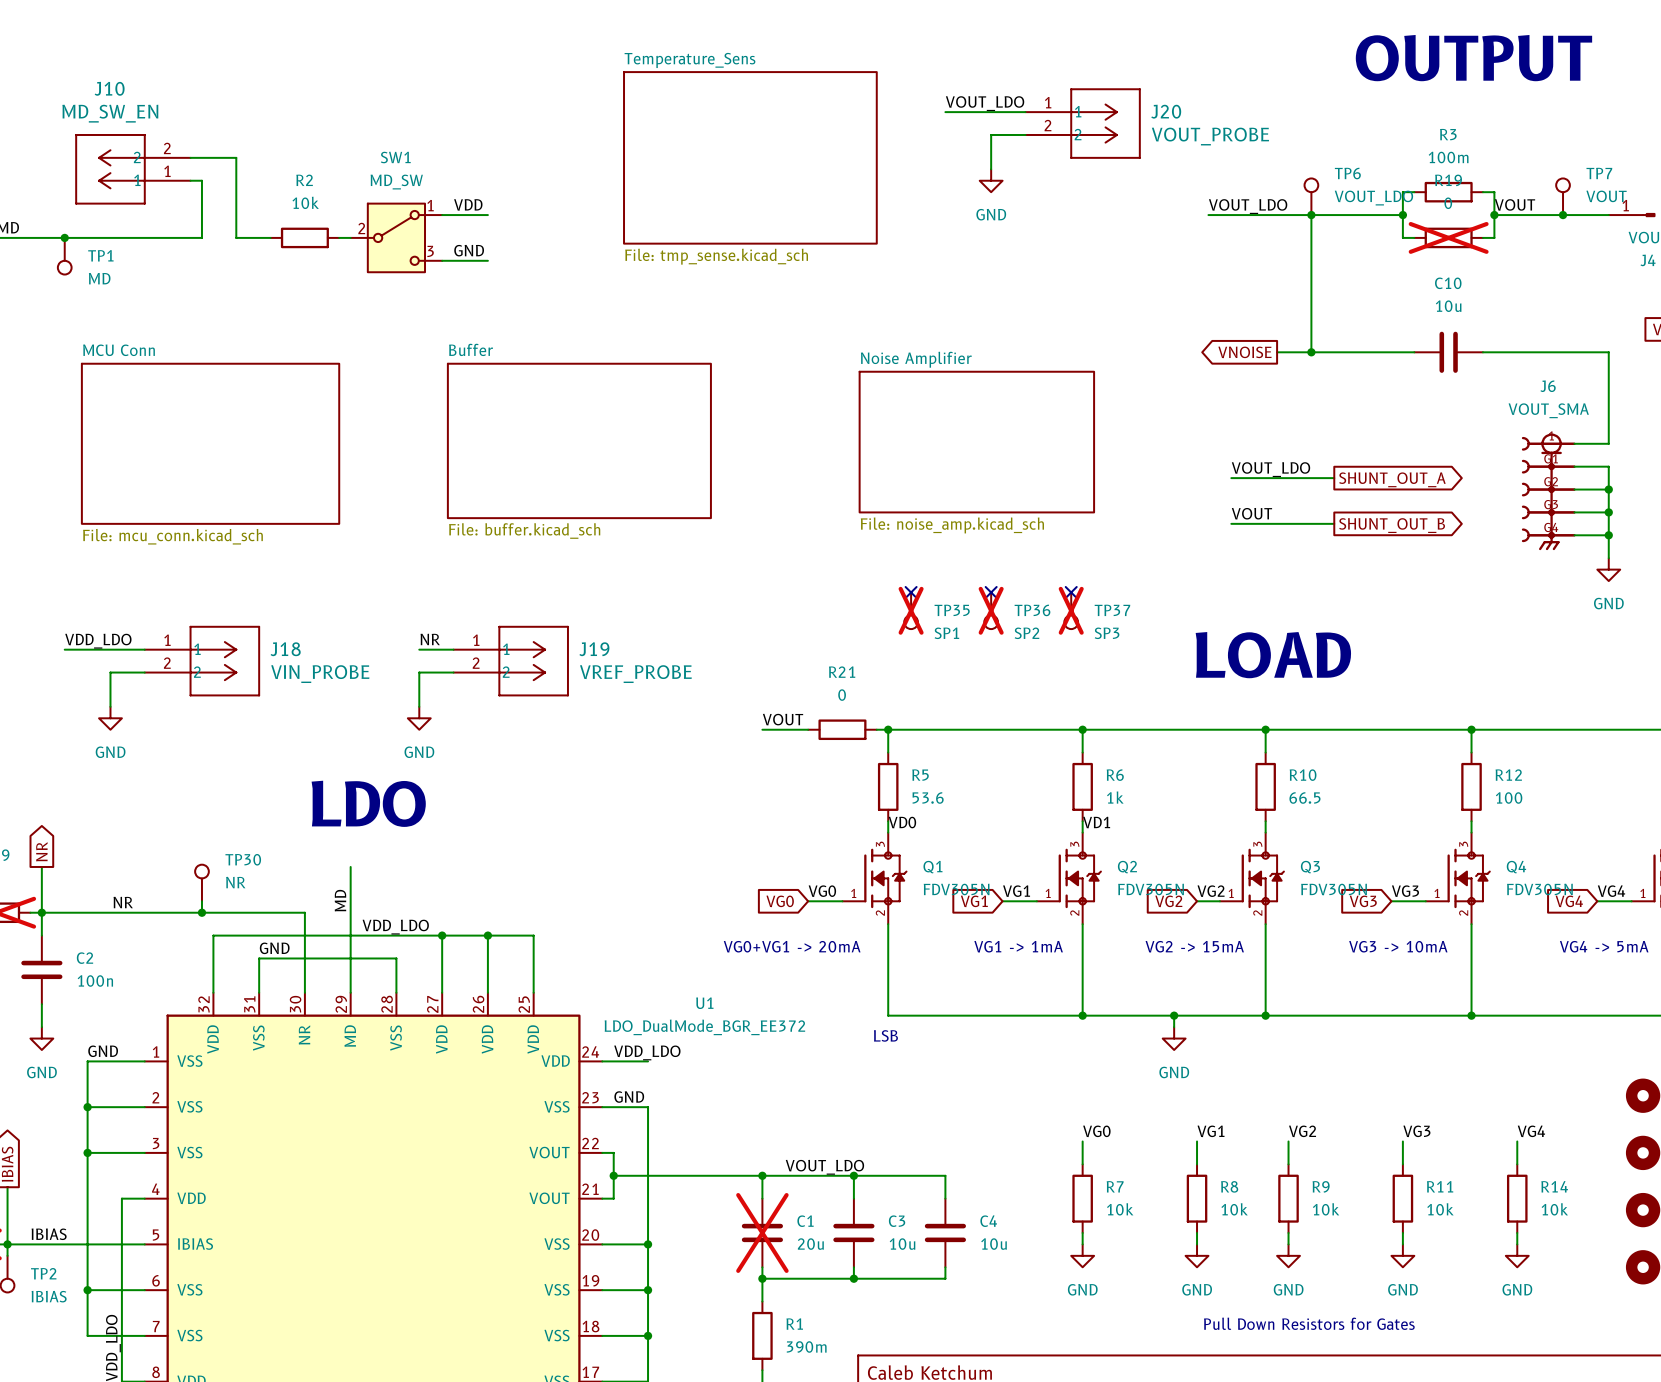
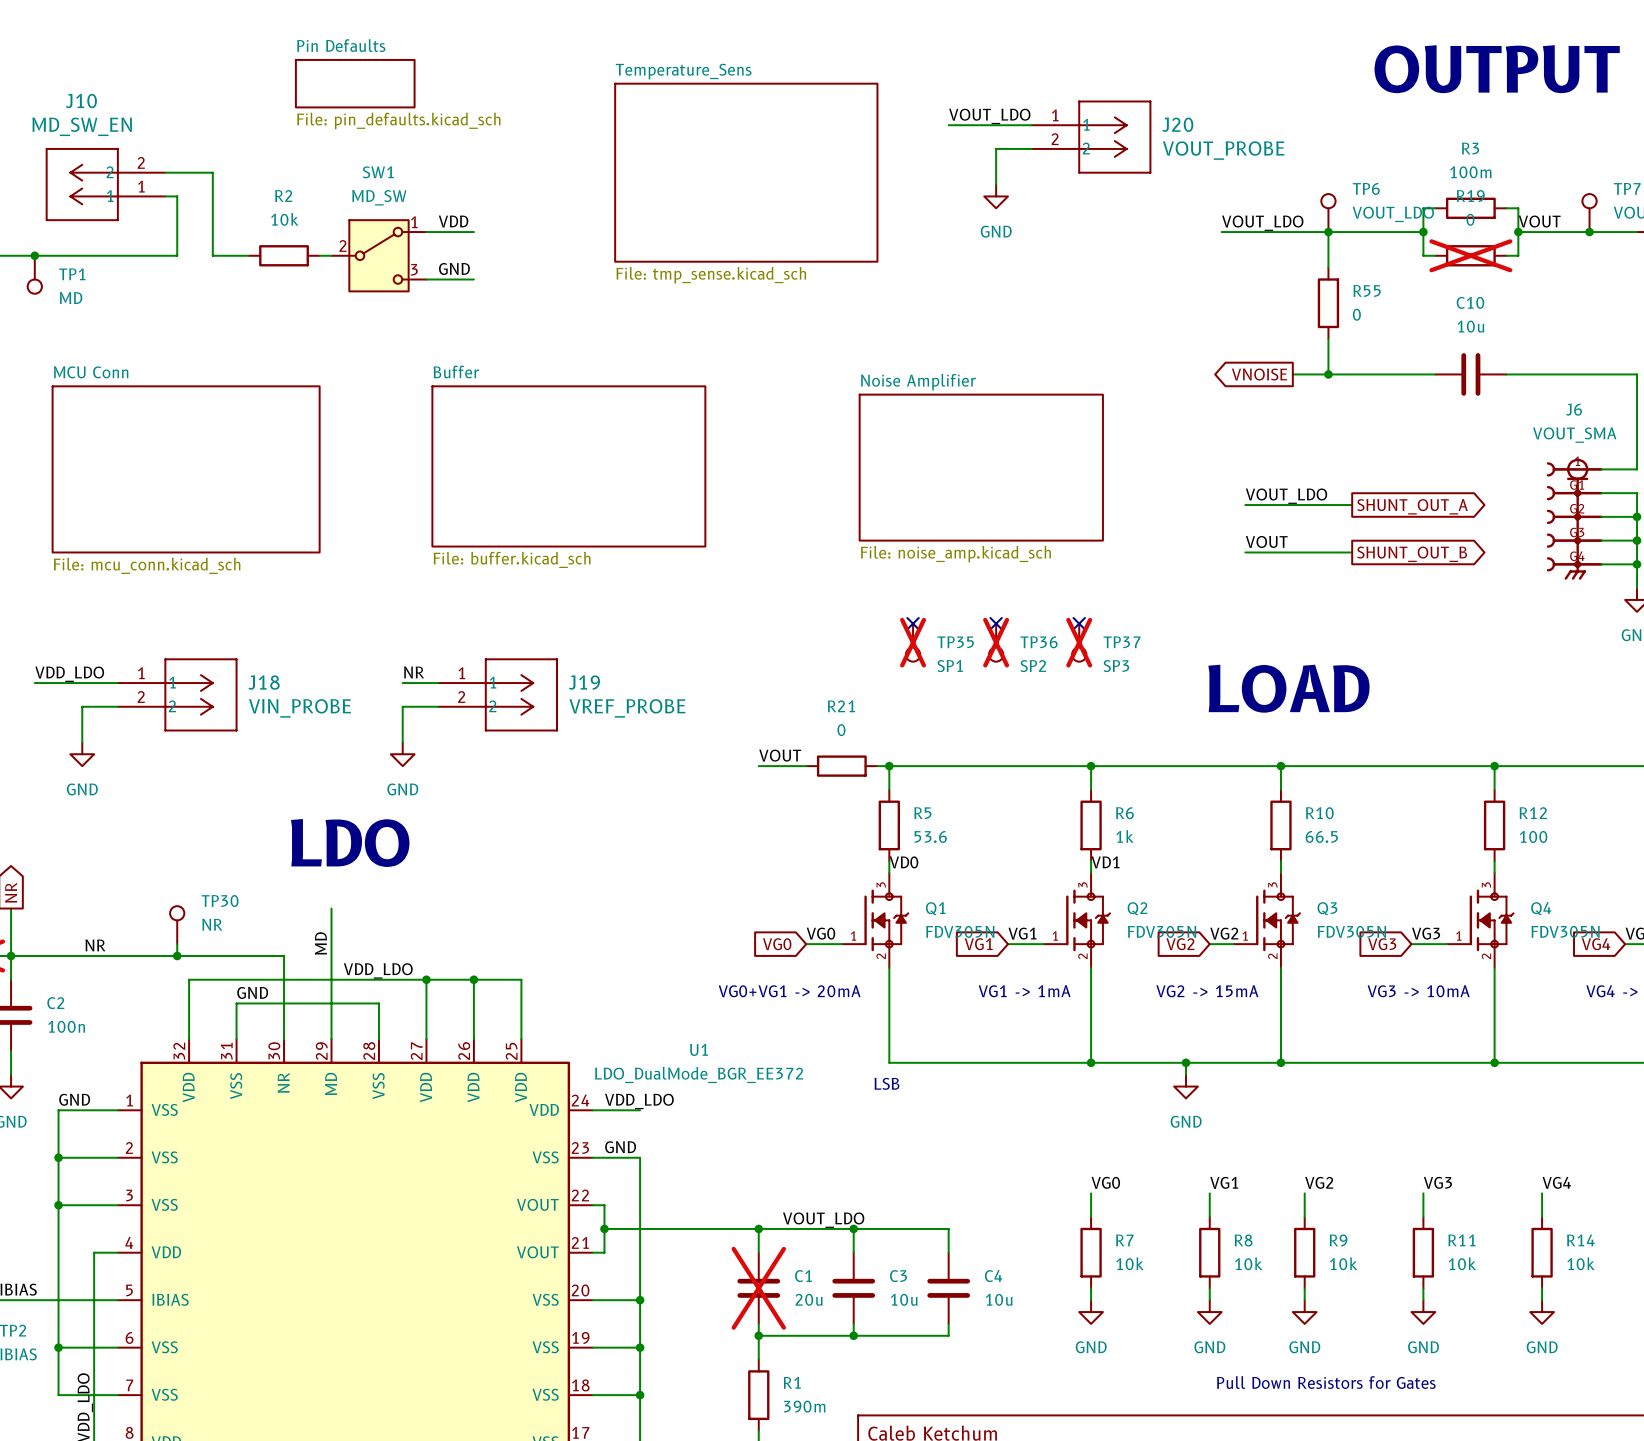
sheet Pin Defaults: none -> File: pin_defaults.kicad_sch (355, 83)
wire: (1311, 249) (1311, 317) -> none
R55: none -> 0 (1328, 303)

